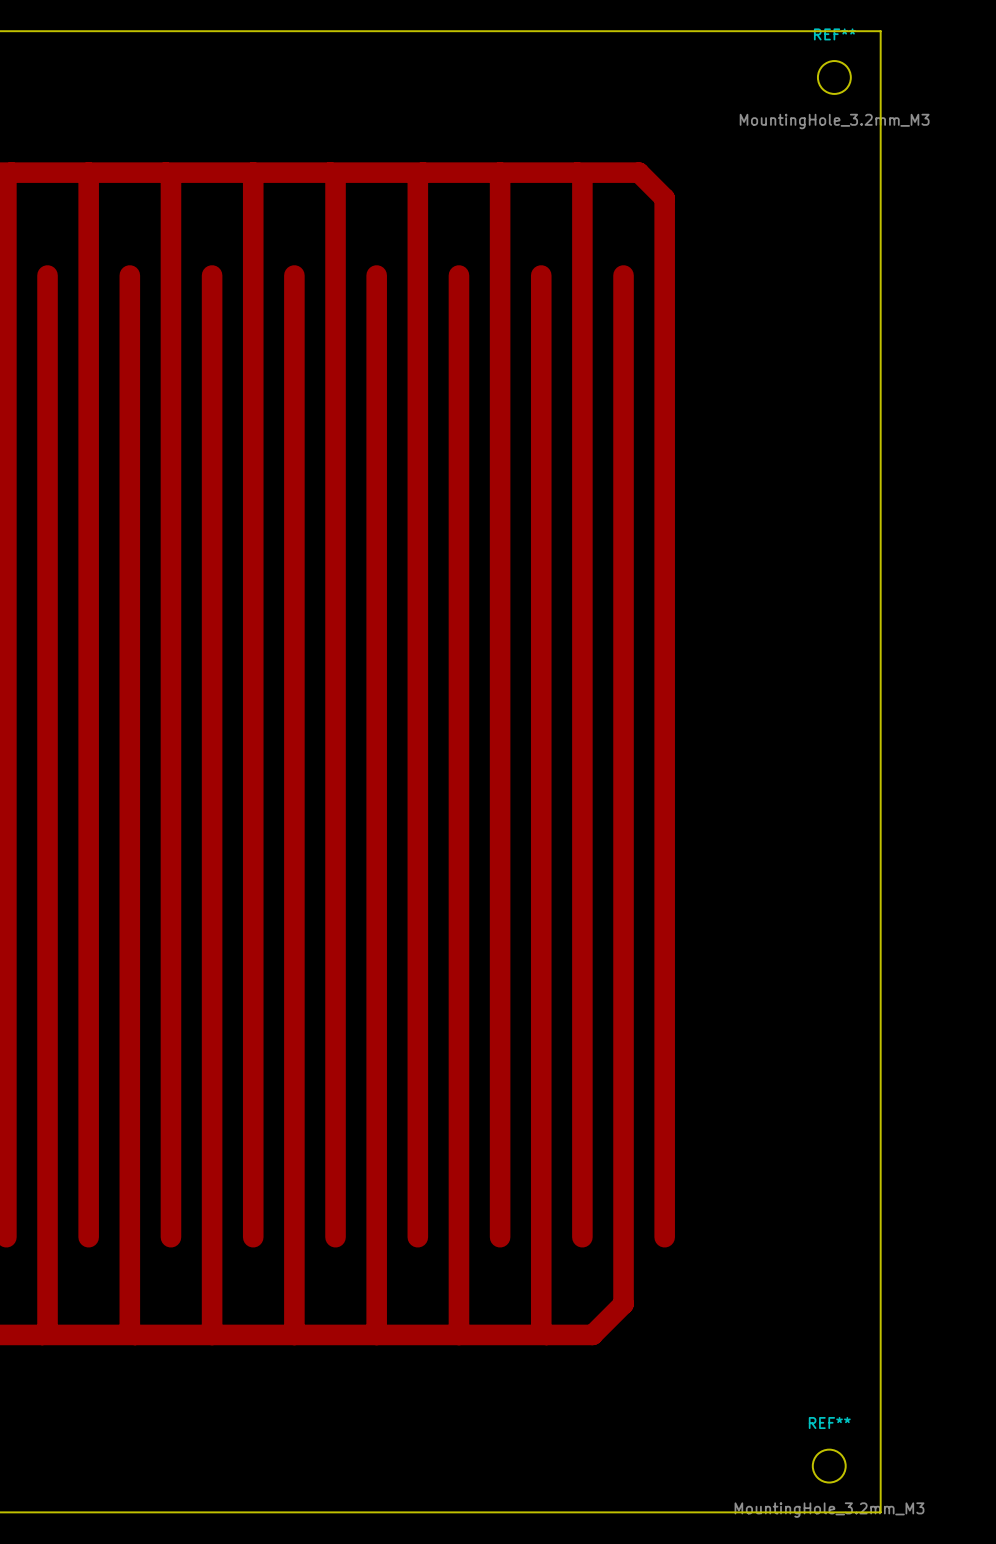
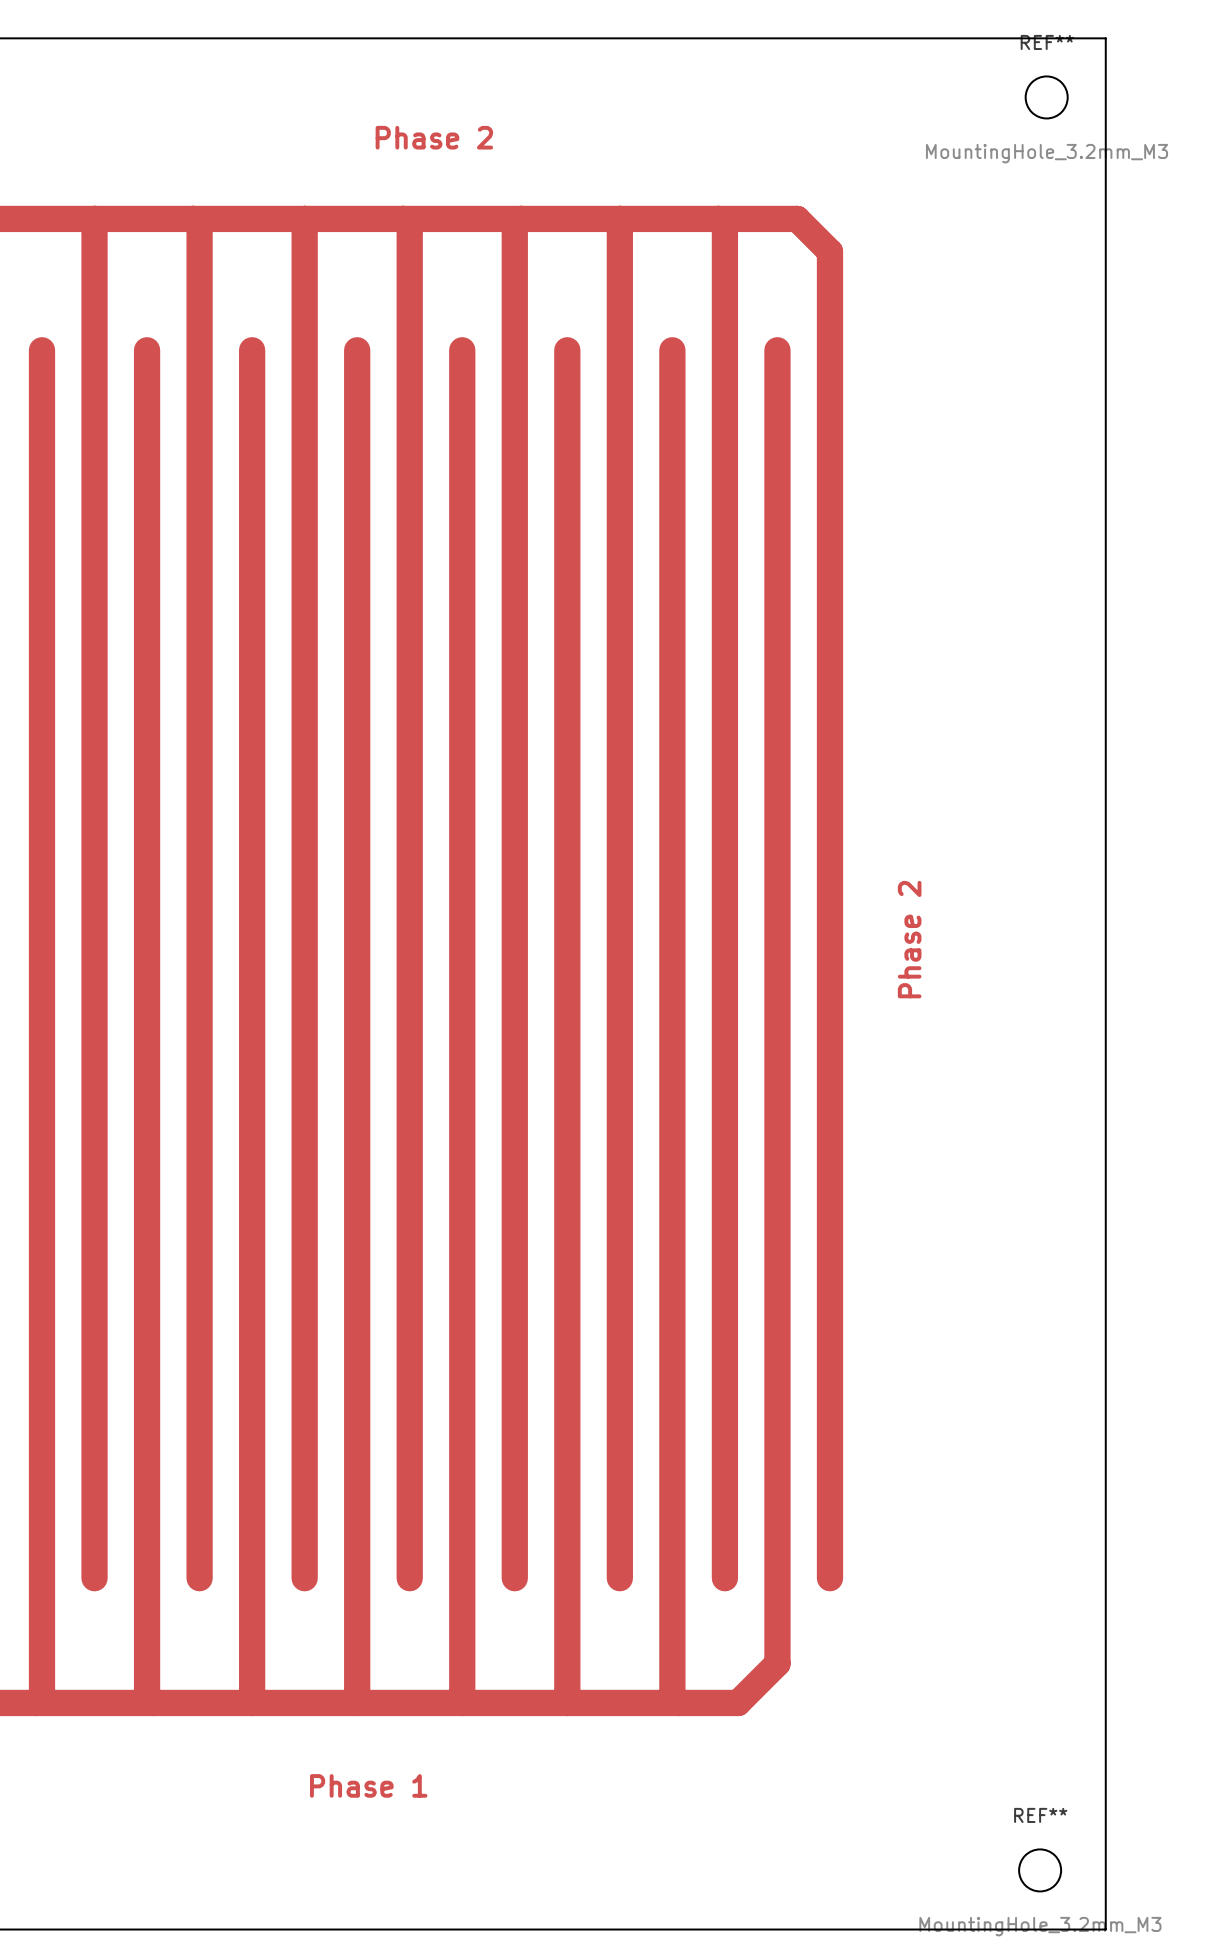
text: none -> Phase 2 (434, 137)
text: none -> Phase 2 (909, 939)
text: none -> Phase 1 (368, 1785)

